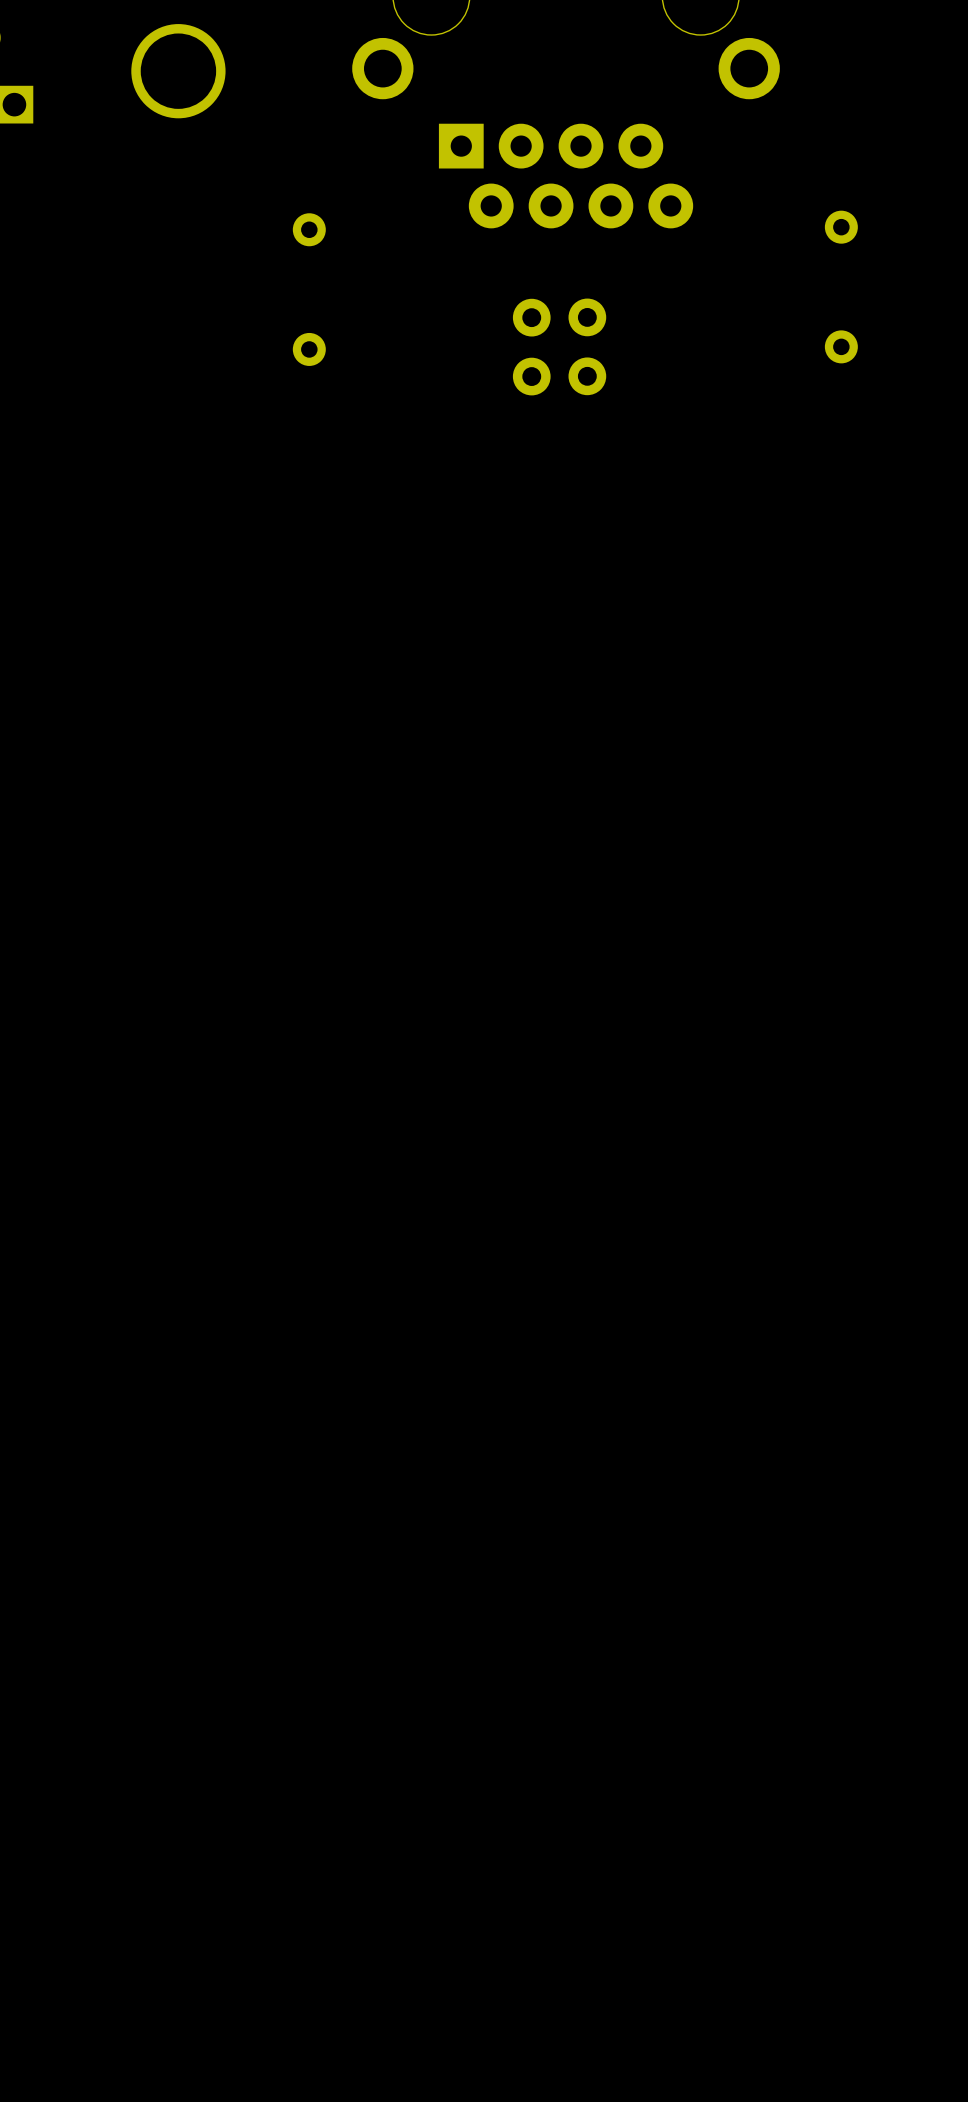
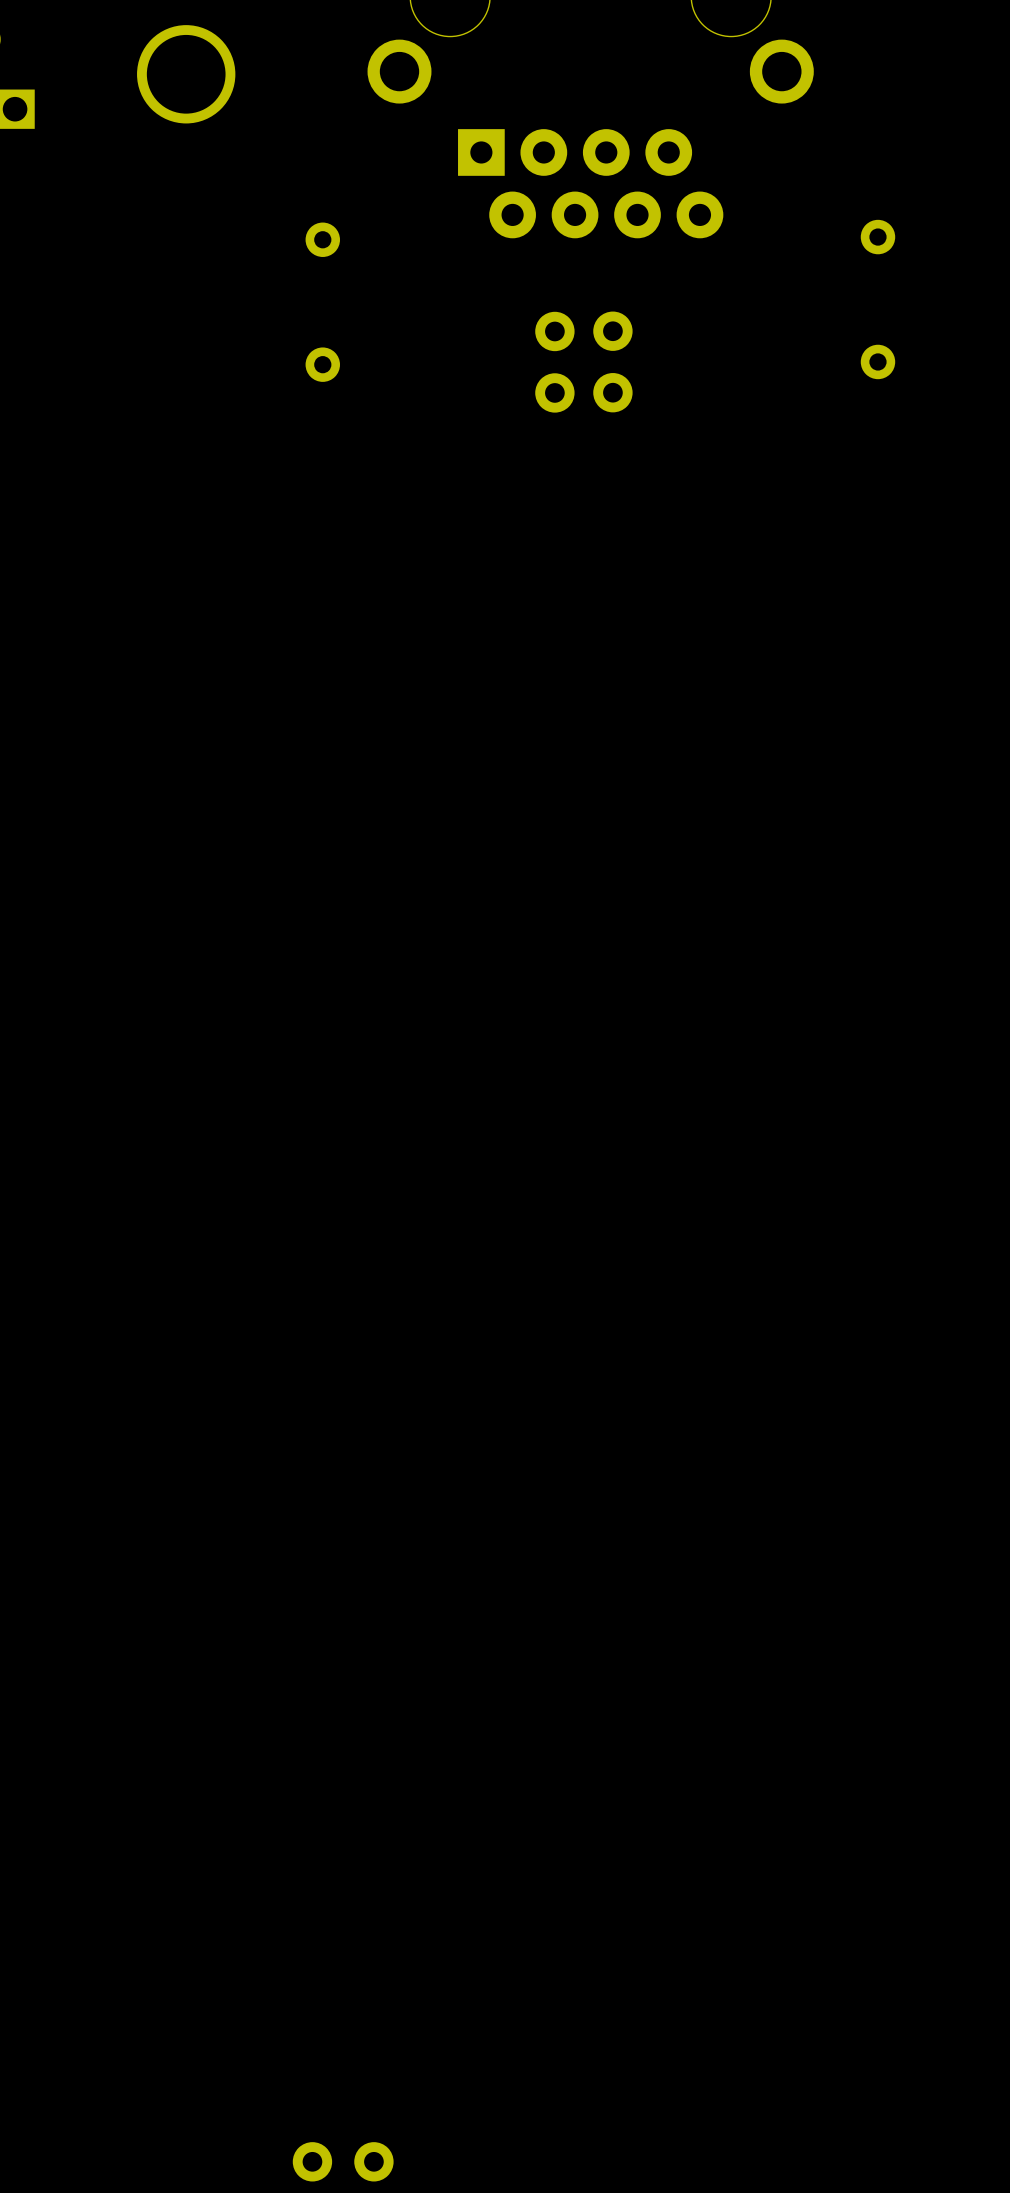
part: none -> (343, 2161)

